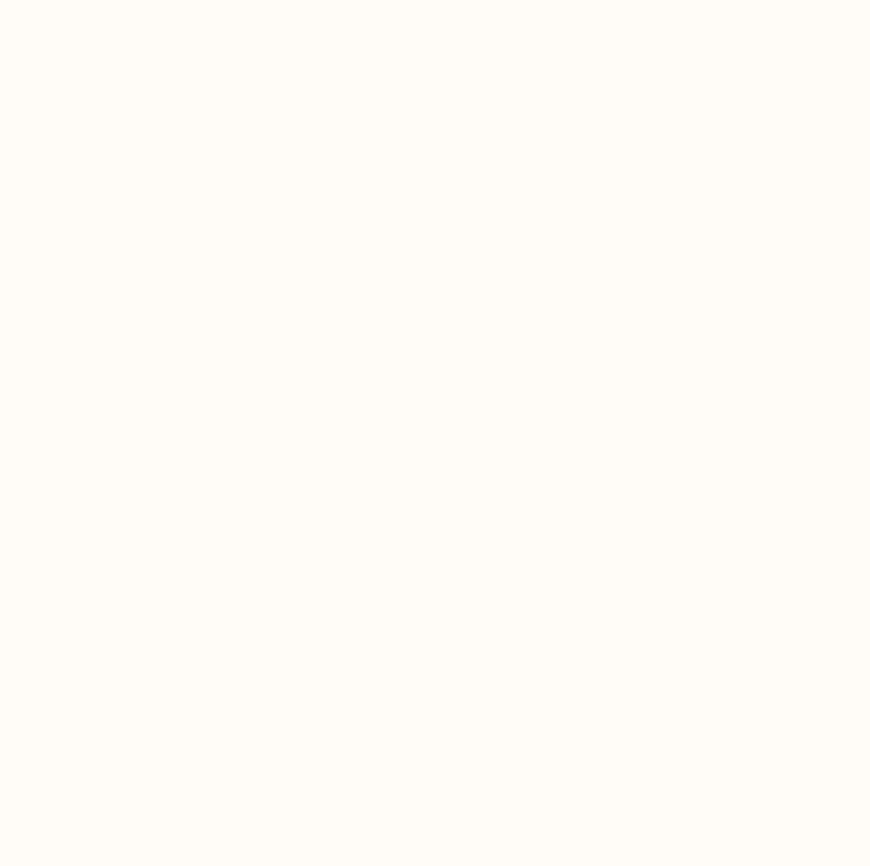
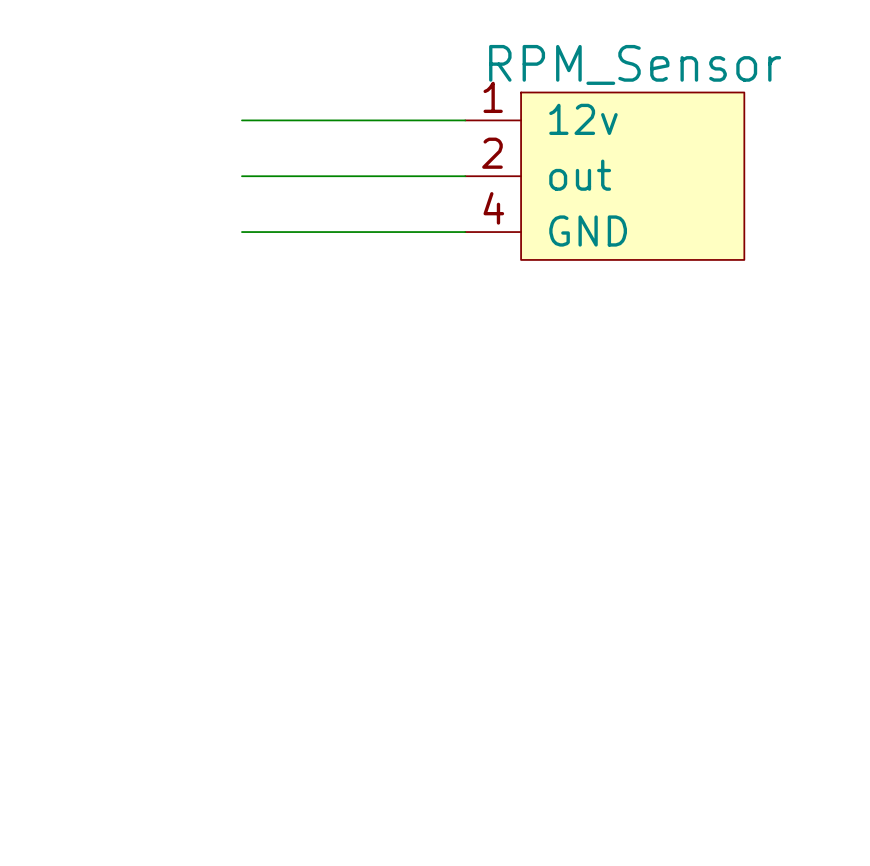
wire: none -> (241, 120) (465, 120)
wire: none -> (241, 176) (465, 176)
part: none -> RPM_Sensor (604, 176)
wire: none -> (241, 232) (465, 232)

